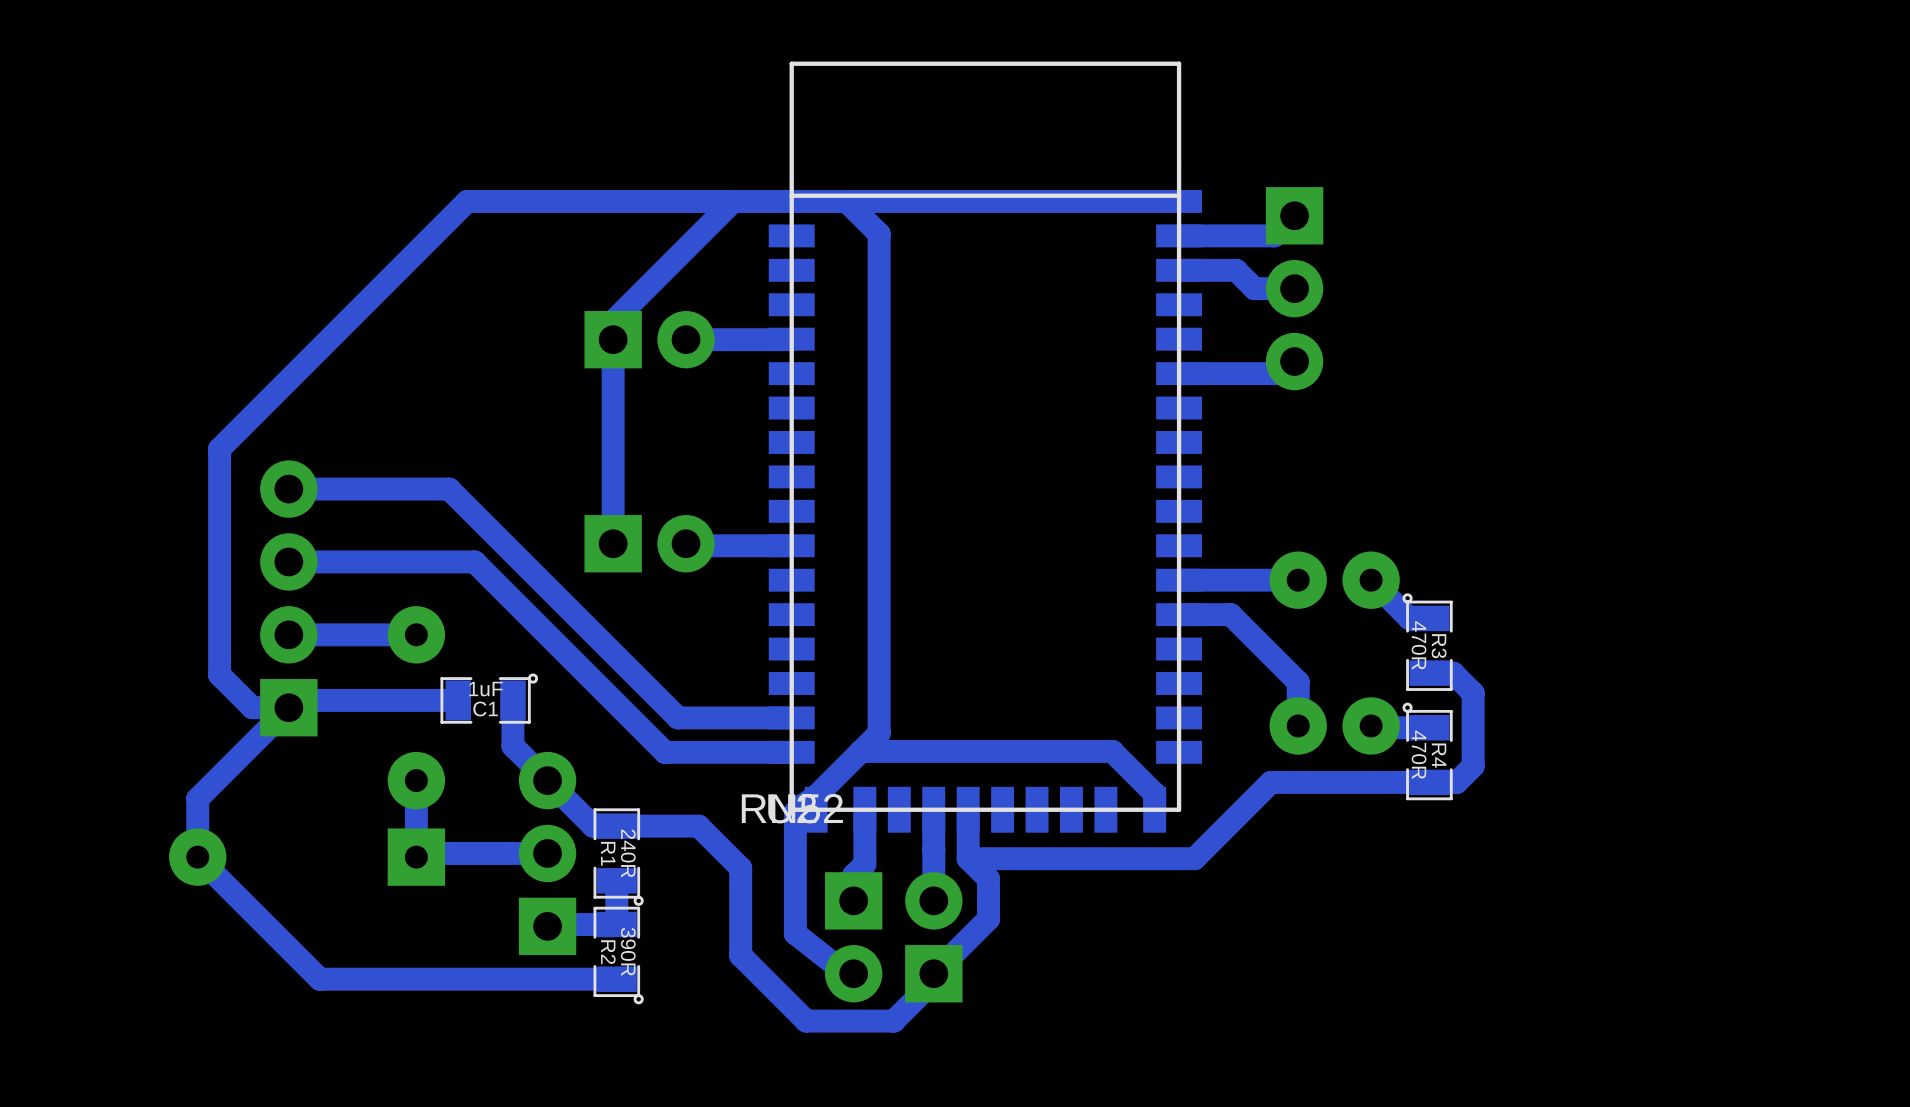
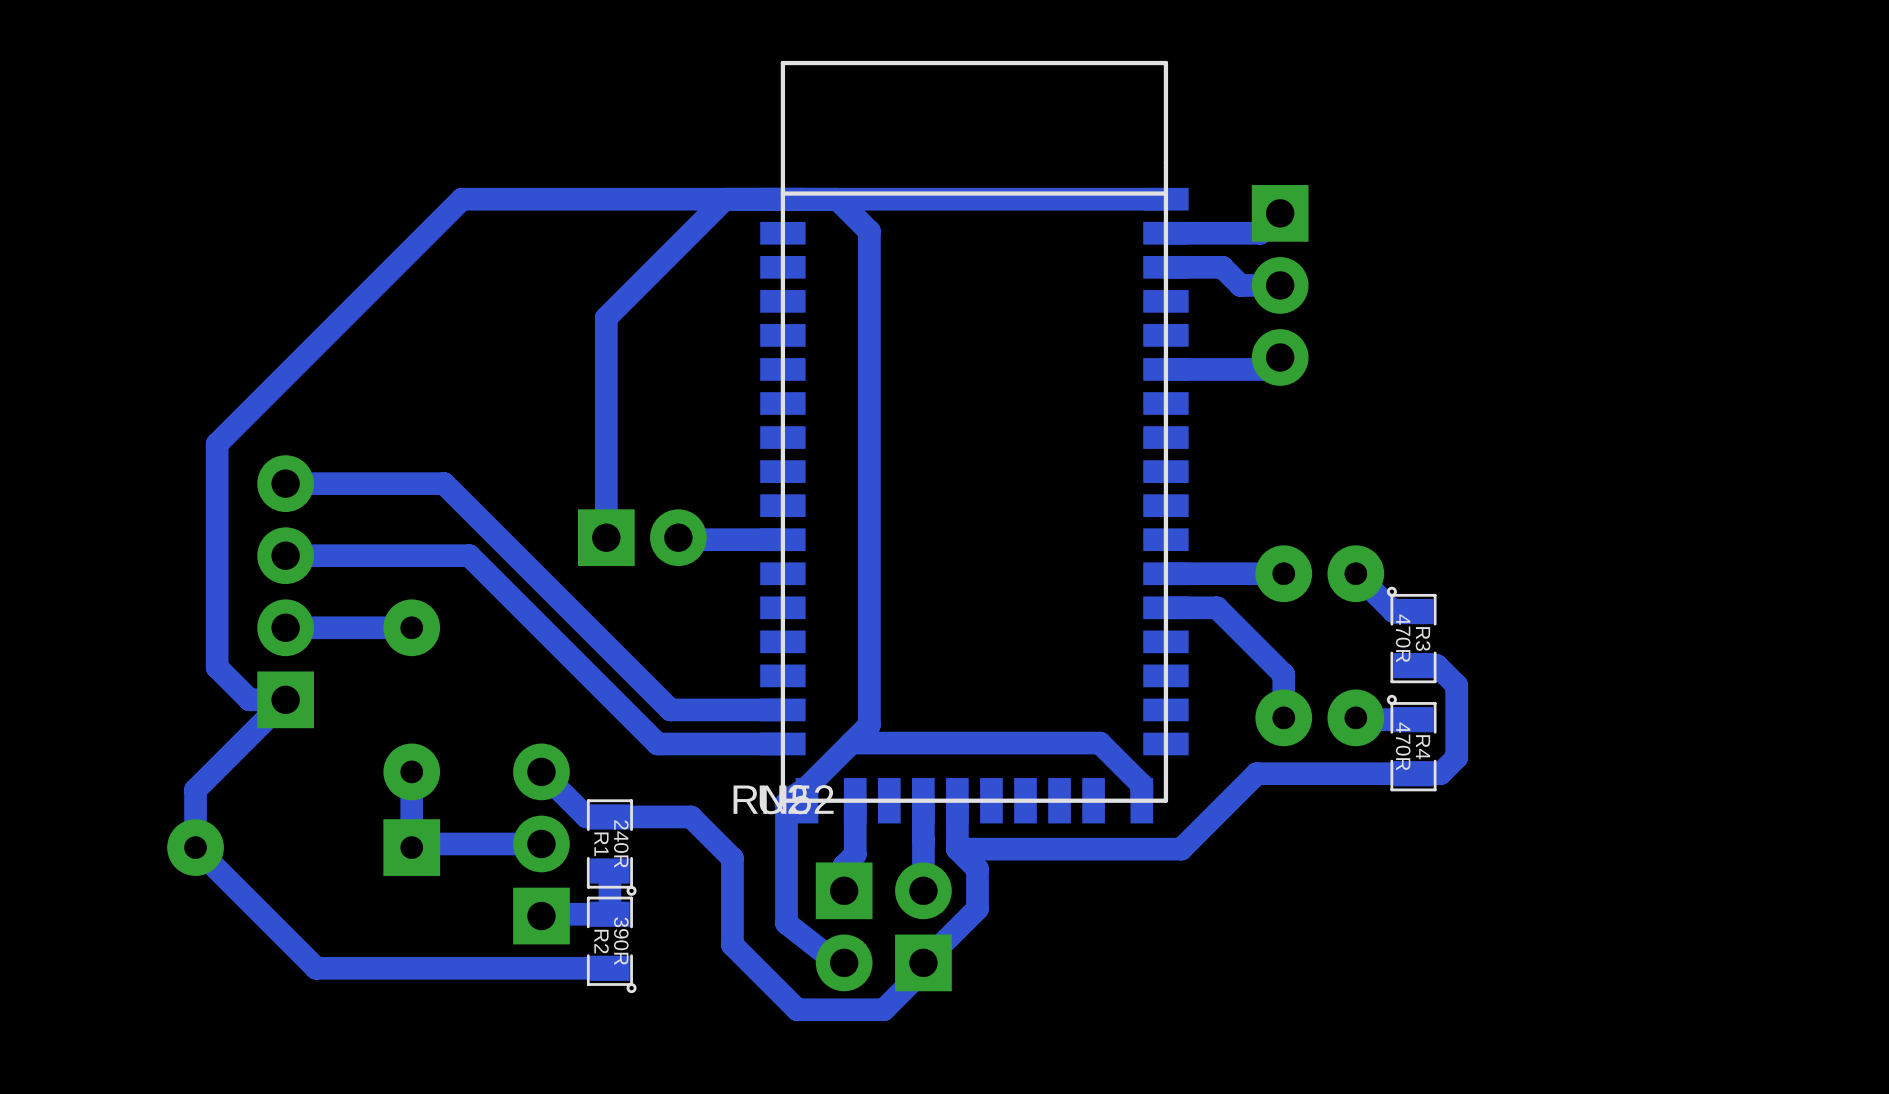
part: (649, 339) -> none
bottom track: (791, 339) (686, 339) -> none
C1: 1uF (489, 698) -> none
bottom track: (458, 700) (296, 700) (288, 707) -> none
bottom track: (512, 700) (512, 745) (547, 780) -> none

